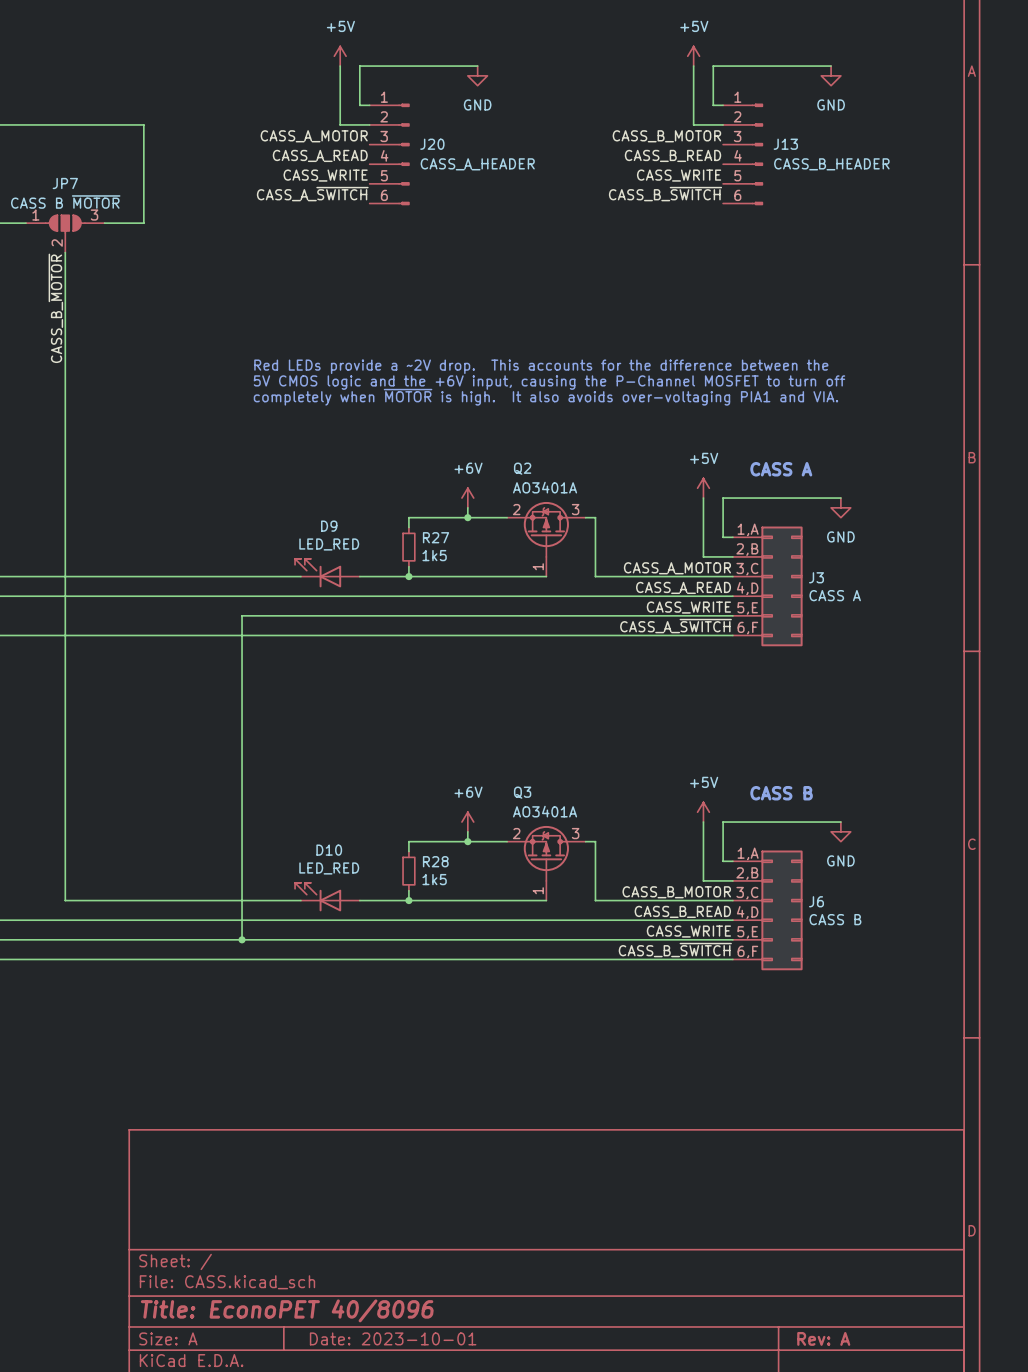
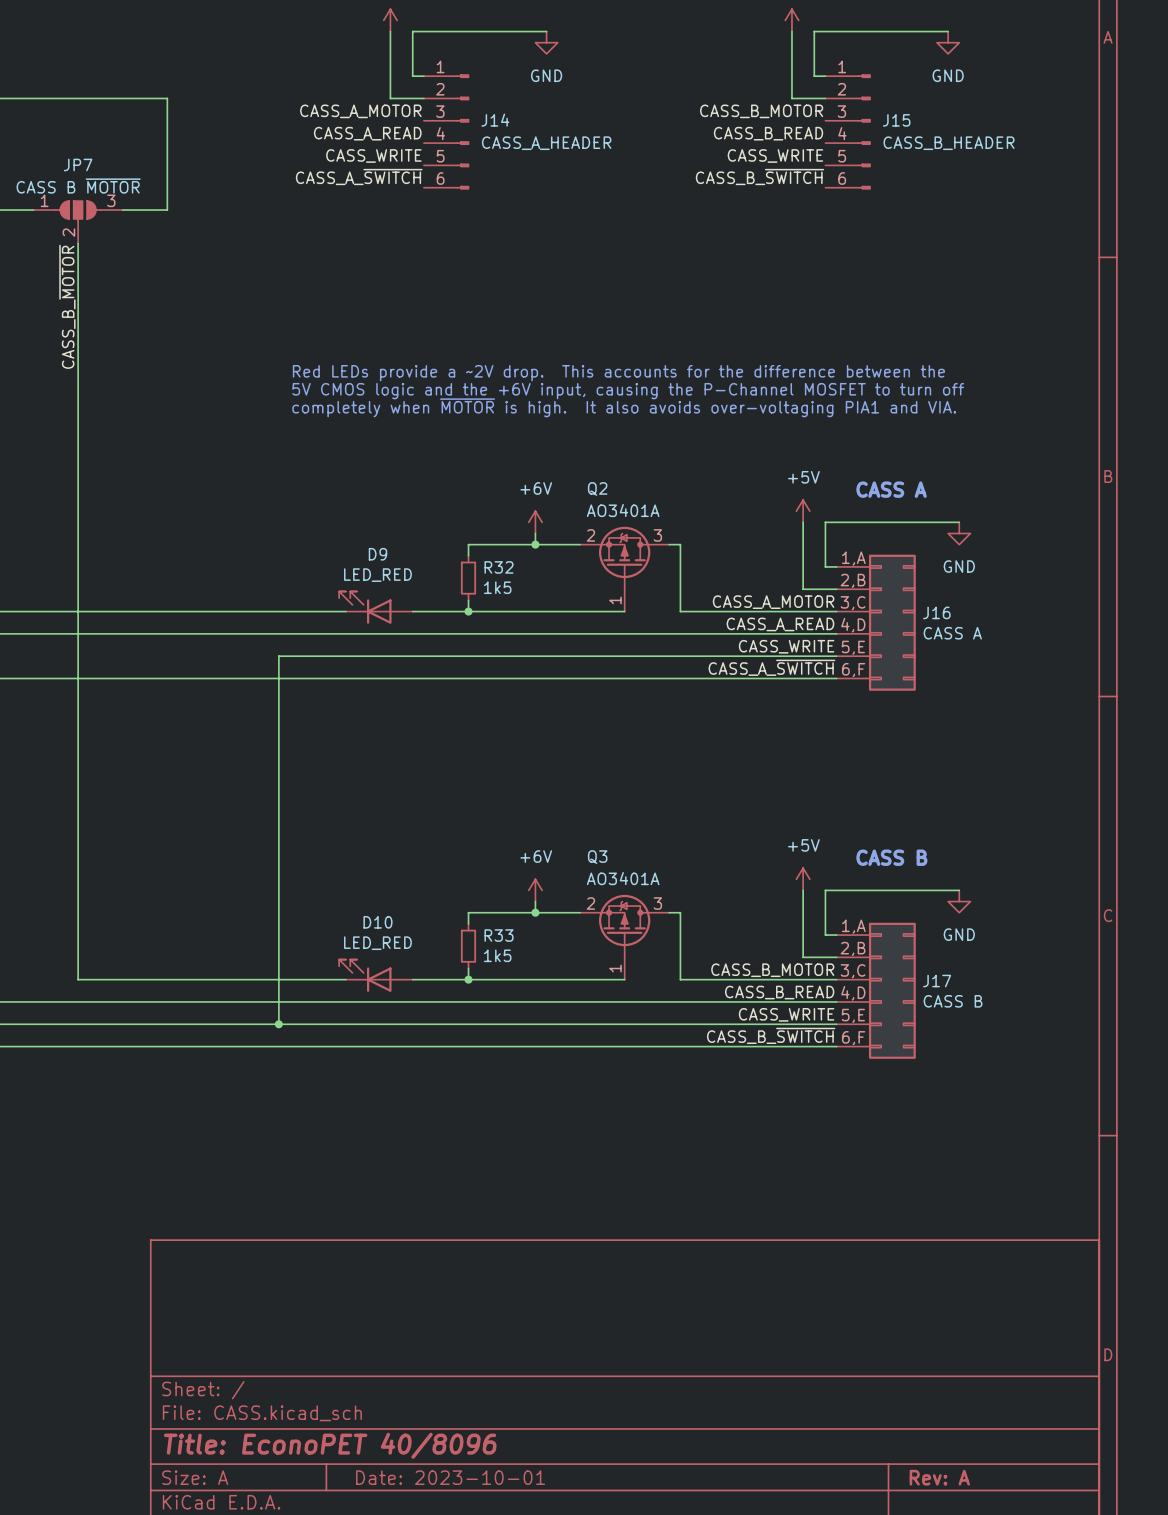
J20 name: J20 (432, 144) -> J14 (495, 120)
J13 name: J13 (785, 144) -> J15 (896, 120)
R27 name: R27 (436, 537) -> R32 (499, 567)
J3 name: J3 (816, 577) -> J16 (936, 612)
R28 name: R28 (435, 861) -> R33 (499, 935)
J6 name: J6 (816, 901) -> J17 (937, 981)

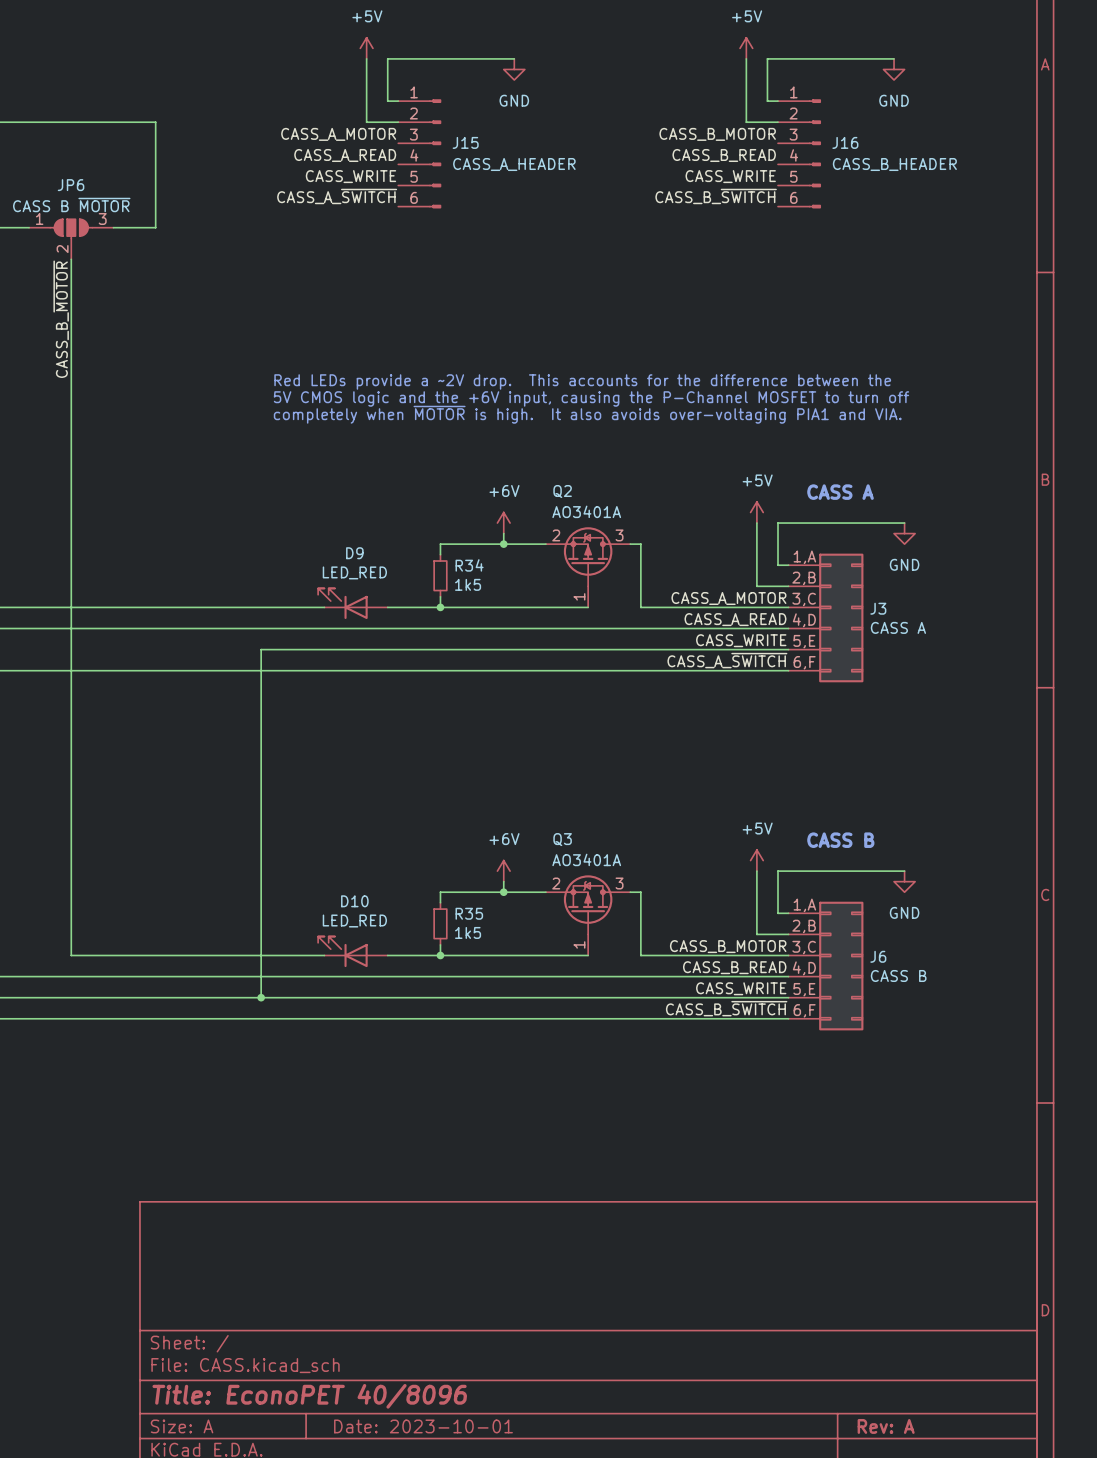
J14 name: J14 (495, 120) -> J15 (465, 142)
J15 name: J15 (896, 120) -> J16 (845, 142)
JP7 name: JP7 (78, 164) -> JP6 (71, 185)
R32 name: R32 (499, 567) -> R34 (469, 565)
J16 name: J16 (936, 612) -> J3 (878, 608)
R33 name: R33 (499, 935) -> R35 (469, 913)
J17 name: J17 (937, 981) -> J6 (878, 956)

